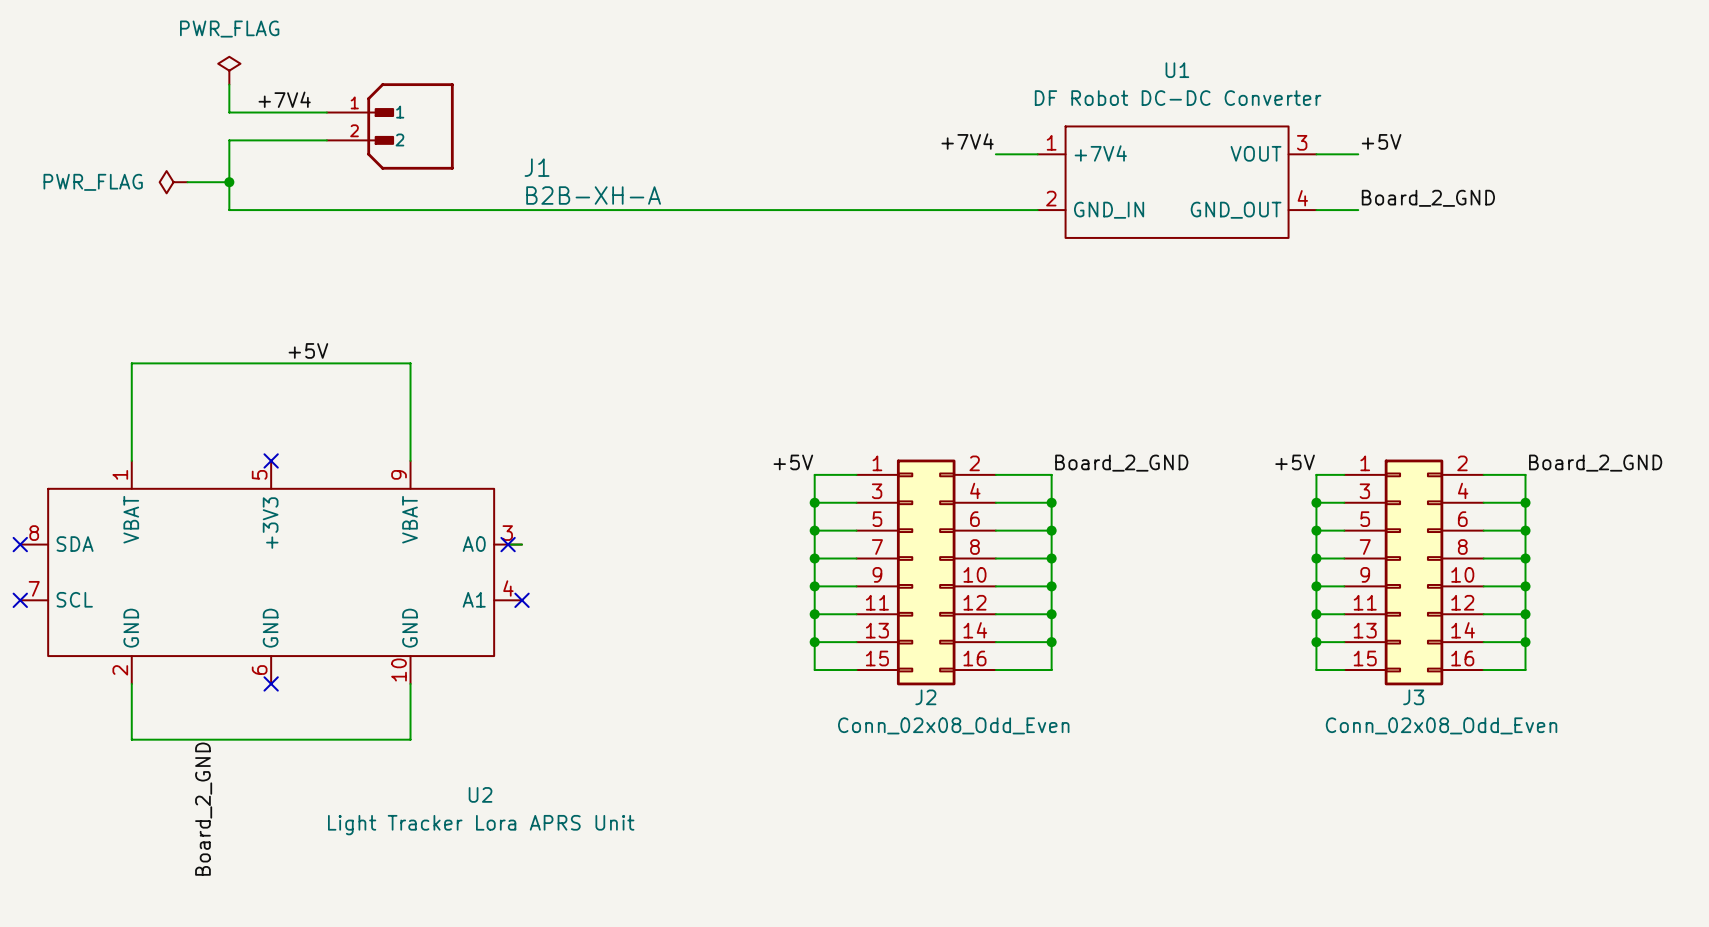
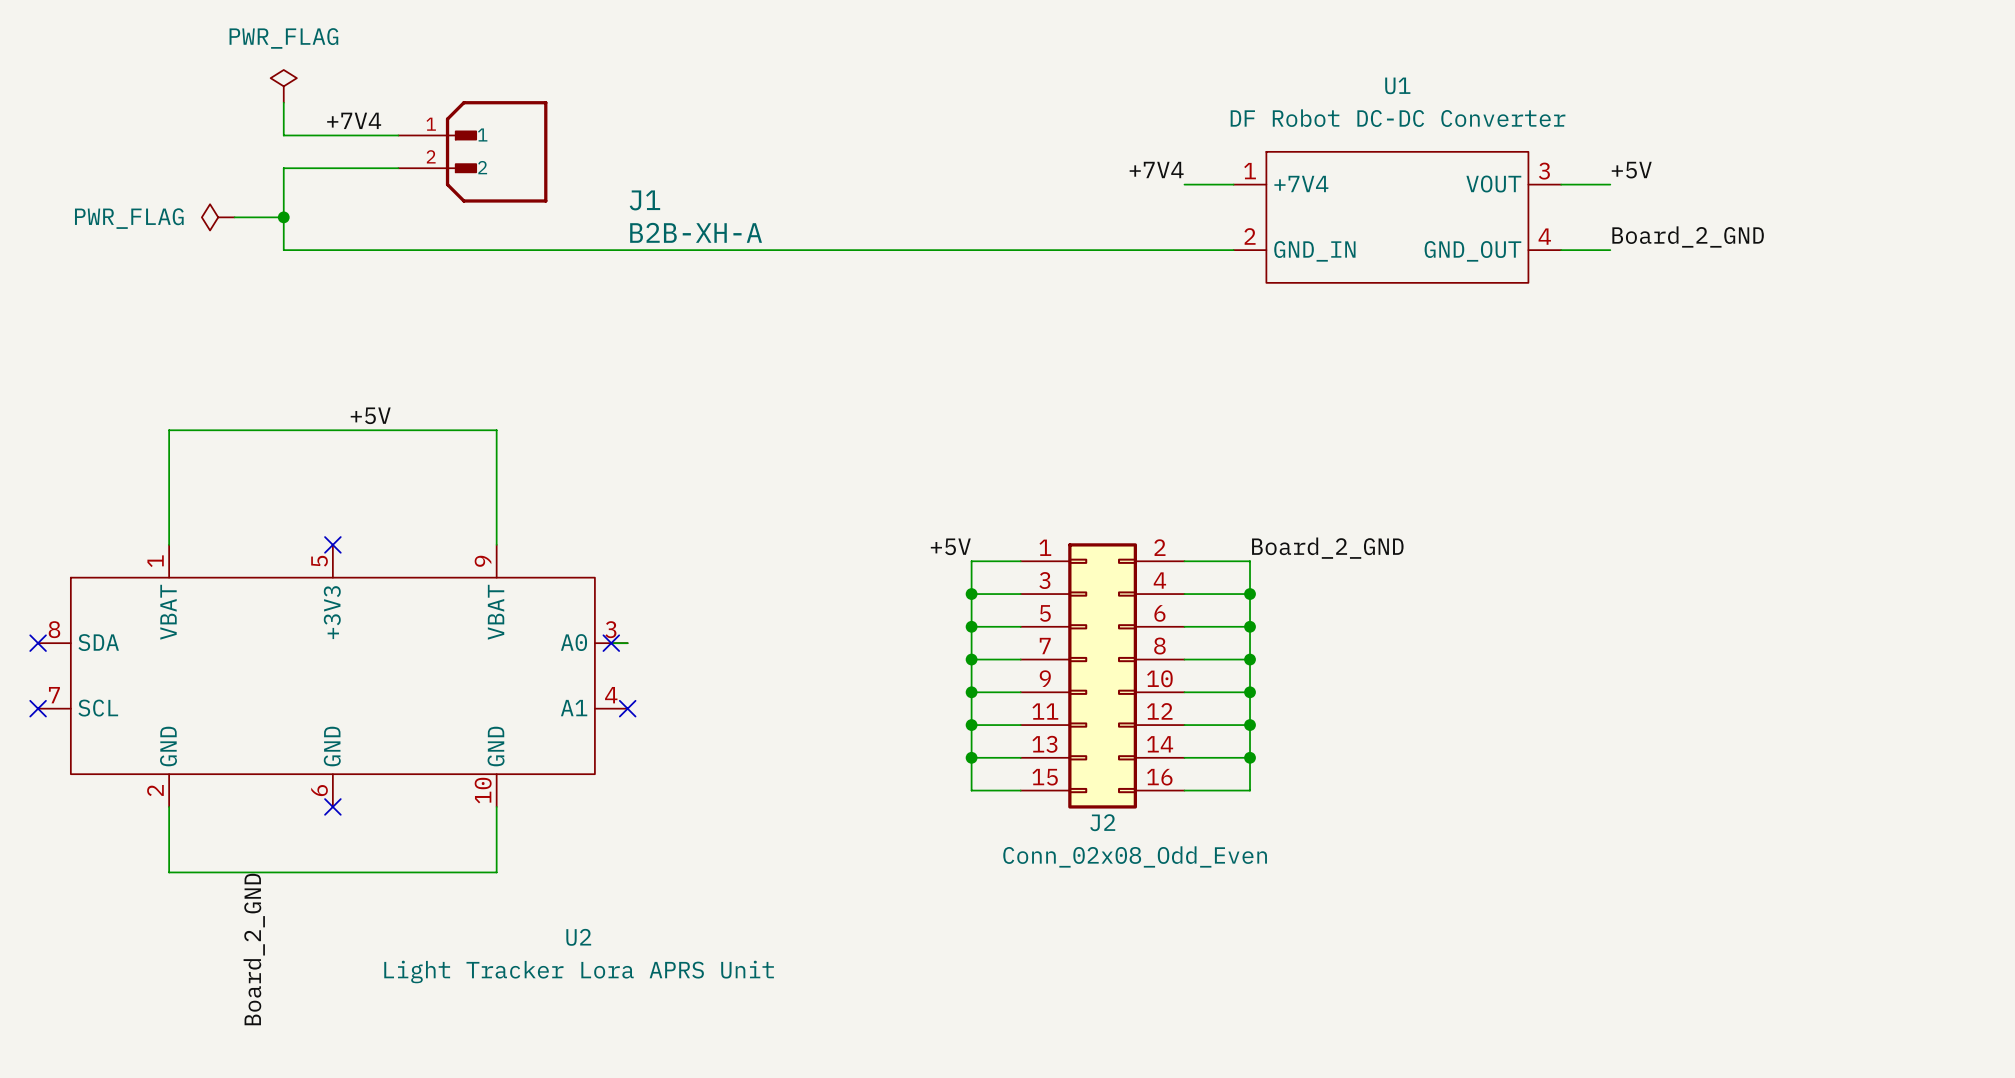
label: +5V (1295, 462) -> none
label: Board_2_GND (1595, 463) -> none
wire: (1344, 474) (1316, 474) (1316, 670) (1344, 670) -> none
wire: (1483, 474) (1525, 474) (1525, 670) (1483, 670) -> none
wire: (1316, 502) (1344, 502) -> none
junction: (1316, 502) -> none
wire: (1483, 502) (1525, 502) -> none
junction: (1525, 502) -> none
wire: (1316, 530) (1344, 530) -> none
junction: (1316, 530) -> none
wire: (1483, 530) (1525, 530) -> none
junction: (1525, 530) -> none
wire: (1316, 558) (1344, 558) -> none
junction: (1316, 558) -> none
wire: (1483, 558) (1525, 558) -> none
junction: (1525, 558) -> none
J3: Conn_02x08_Odd_Even (1414, 572) -> none
wire: (1316, 586) (1344, 586) -> none
junction: (1316, 586) -> none
wire: (1483, 586) (1525, 586) -> none
junction: (1525, 586) -> none
wire: (1316, 614) (1344, 614) -> none
junction: (1316, 614) -> none
wire: (1483, 614) (1525, 614) -> none
junction: (1525, 614) -> none
wire: (1316, 642) (1344, 642) -> none
junction: (1316, 642) -> none
wire: (1483, 642) (1525, 642) -> none
junction: (1525, 642) -> none

